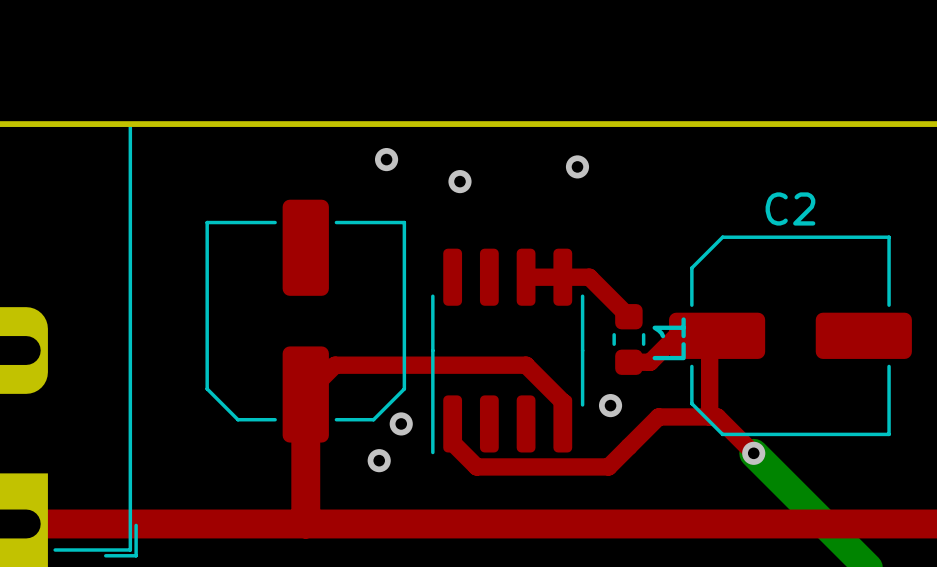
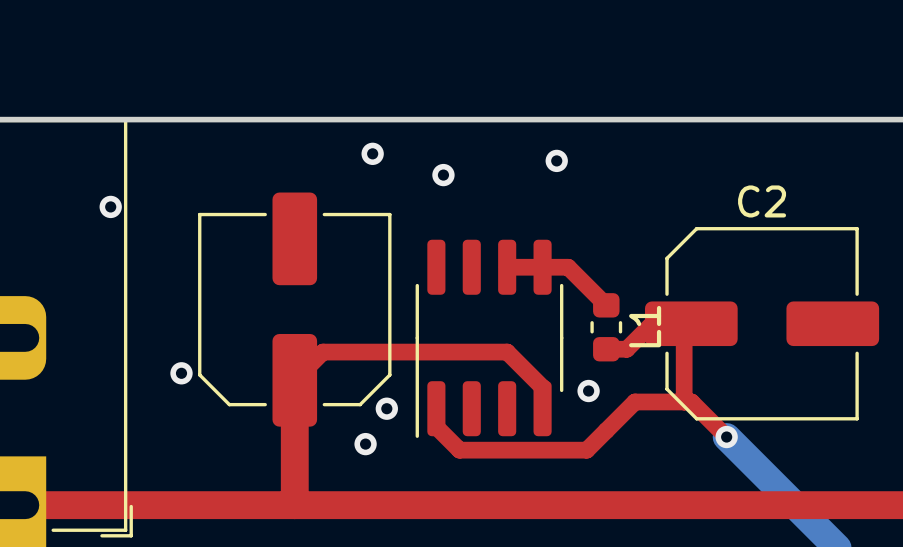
via: none -> (110, 206)
via: none -> (181, 373)

